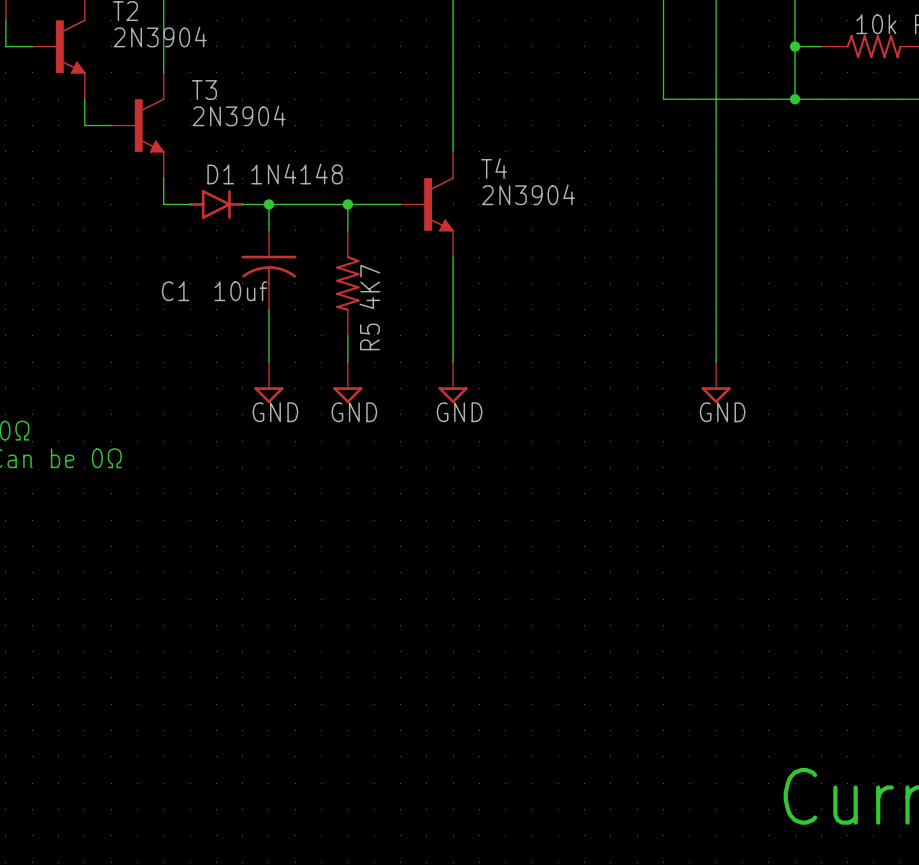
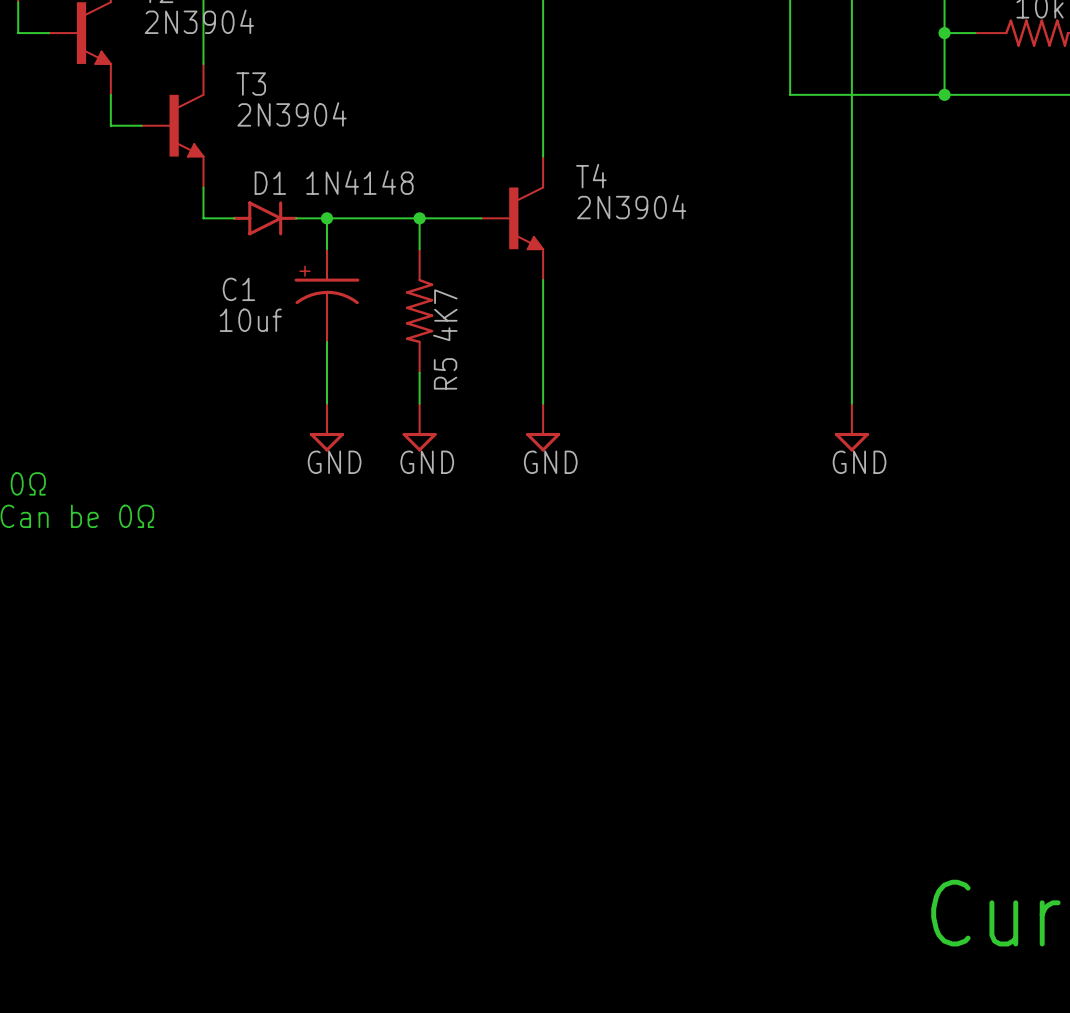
C1 symbol: [241, 230, 297, 310] -> [294, 249, 360, 342]
C1 name position: C1 (175, 291) -> C1 (238, 289)
C1 value position: 10uf (240, 291) -> 10uf (250, 320)

